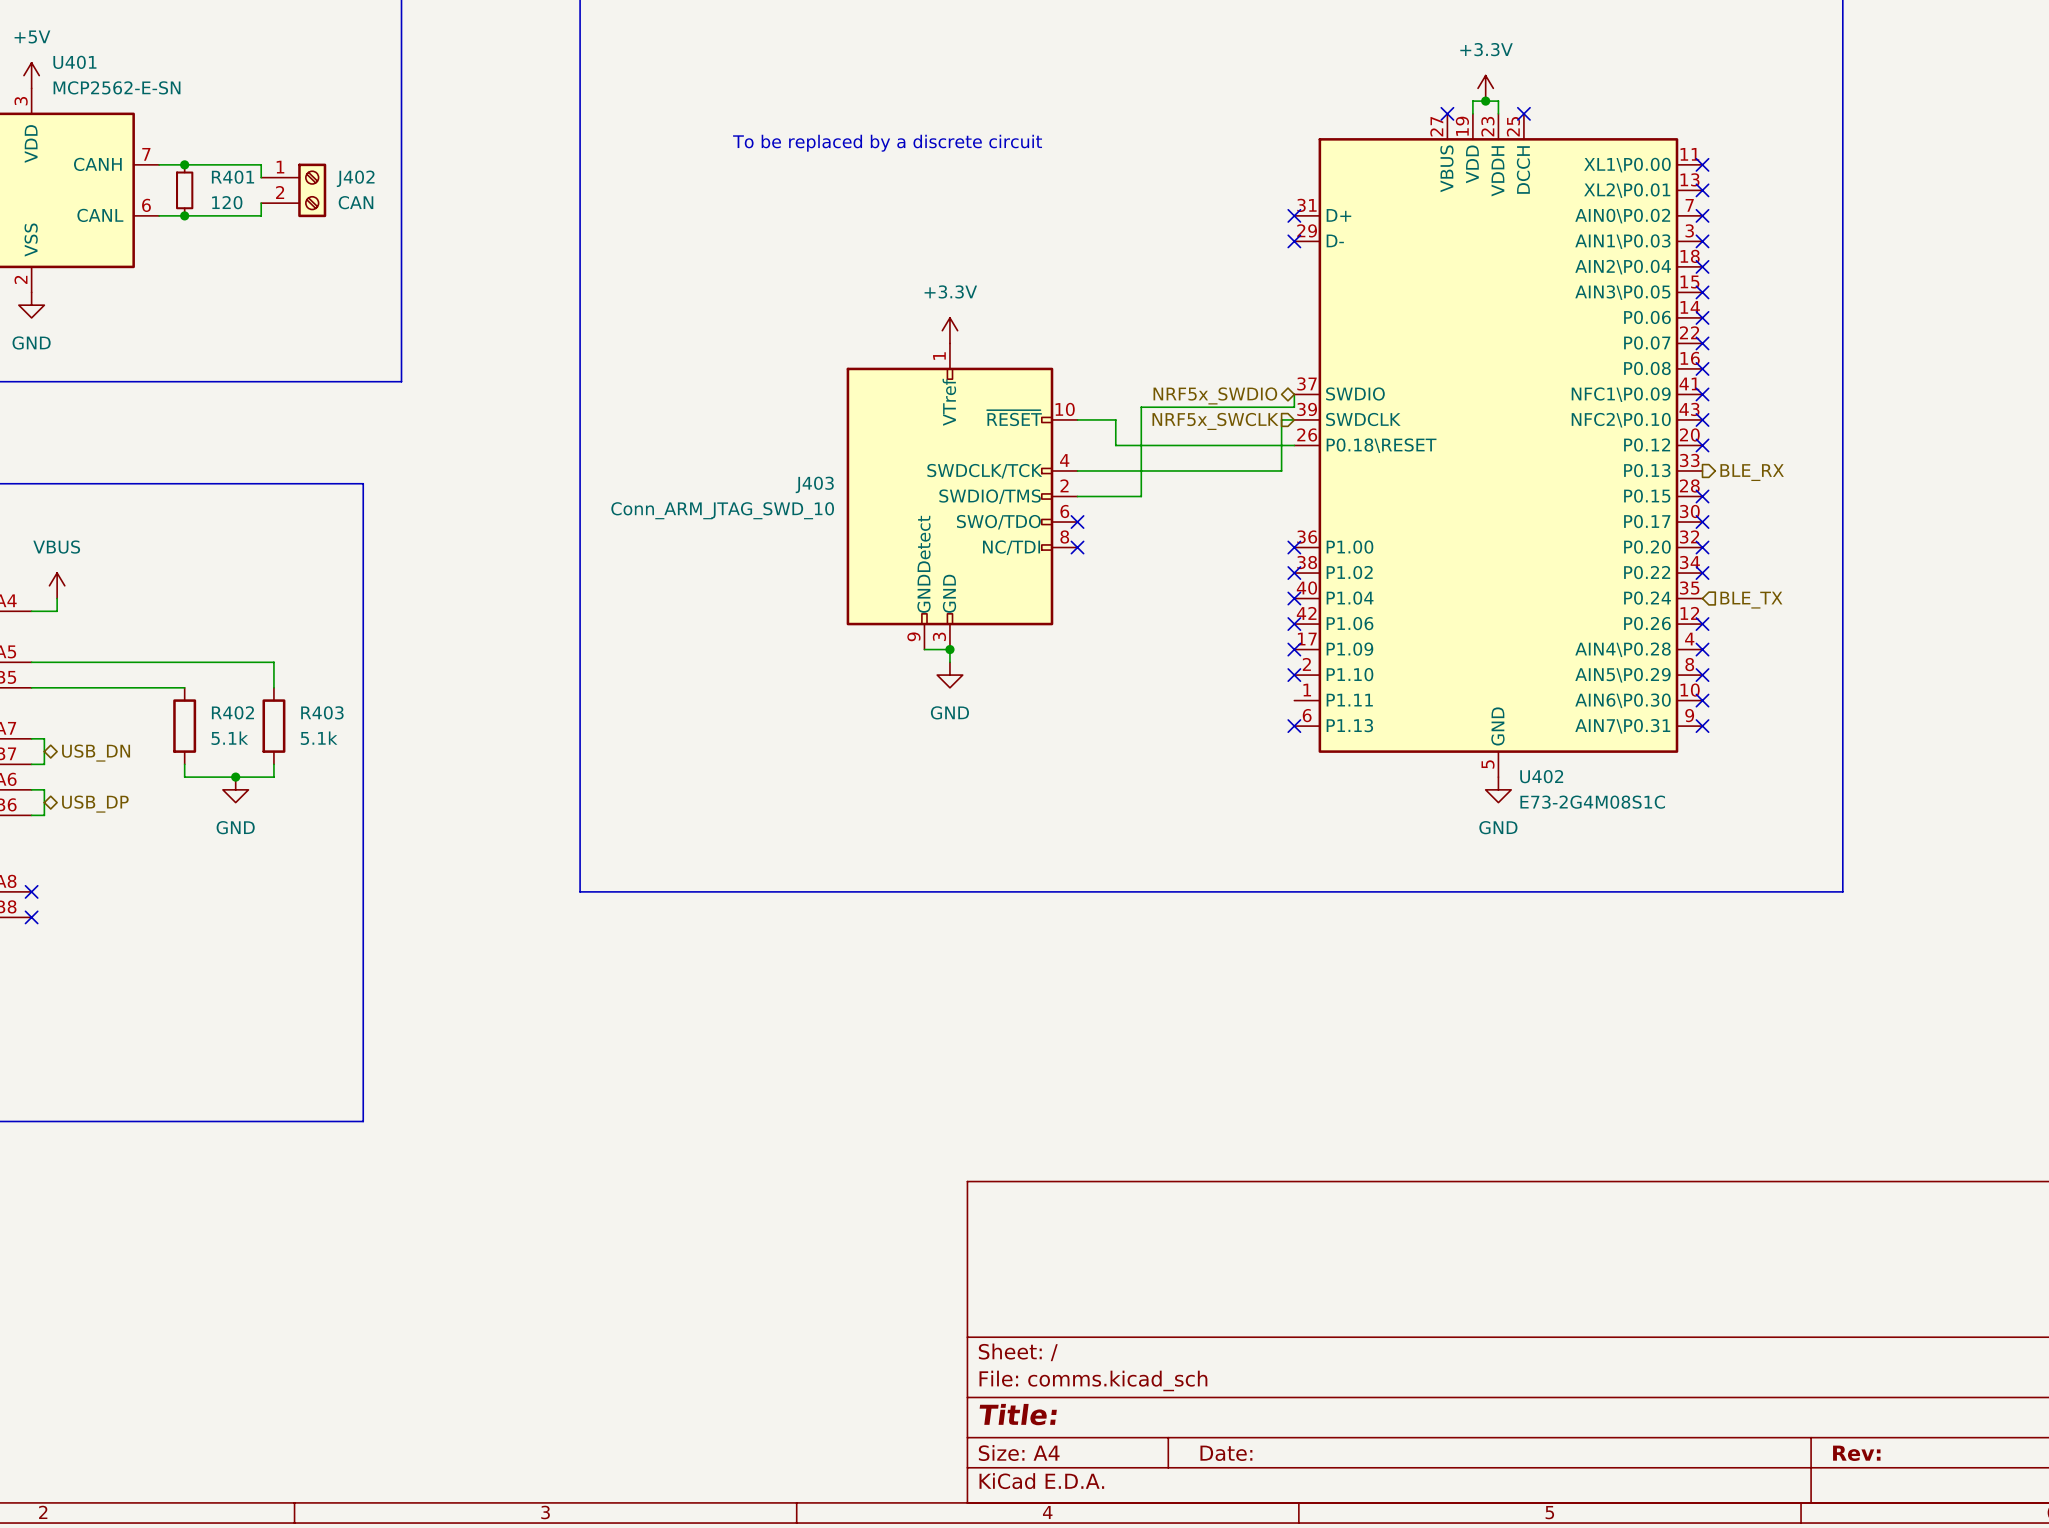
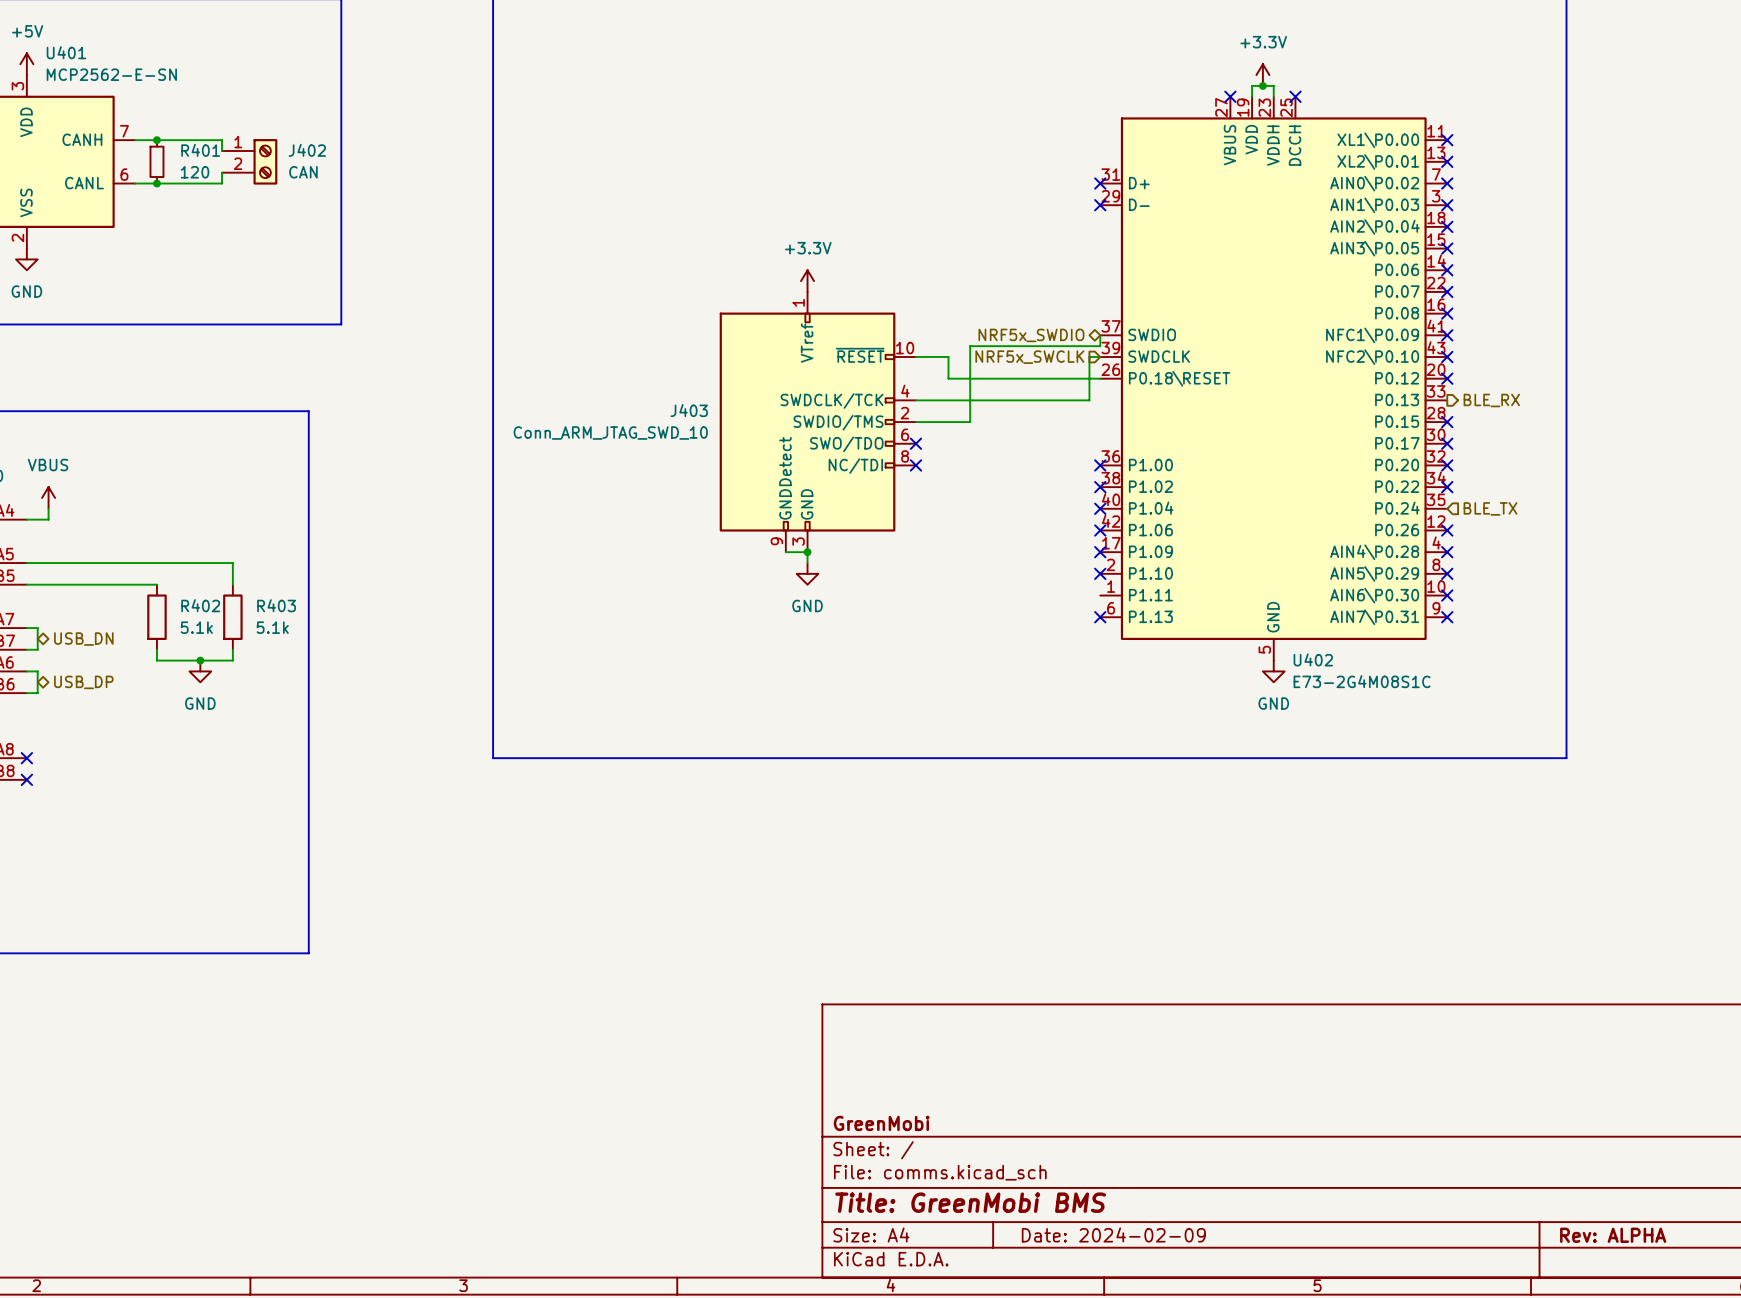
text: To be replaced by a discrete circuit (887, 143) -> none
title block: none -> GreenMobi (881, 1123)
title block: Title: (1018, 1414) -> Title: GreenMobi BMS (970, 1202)
title block: Date: (1226, 1453) -> Date: 2024-02-09 (1113, 1234)
title block: Rev: (1856, 1453) -> Rev: ALPHA (1613, 1235)

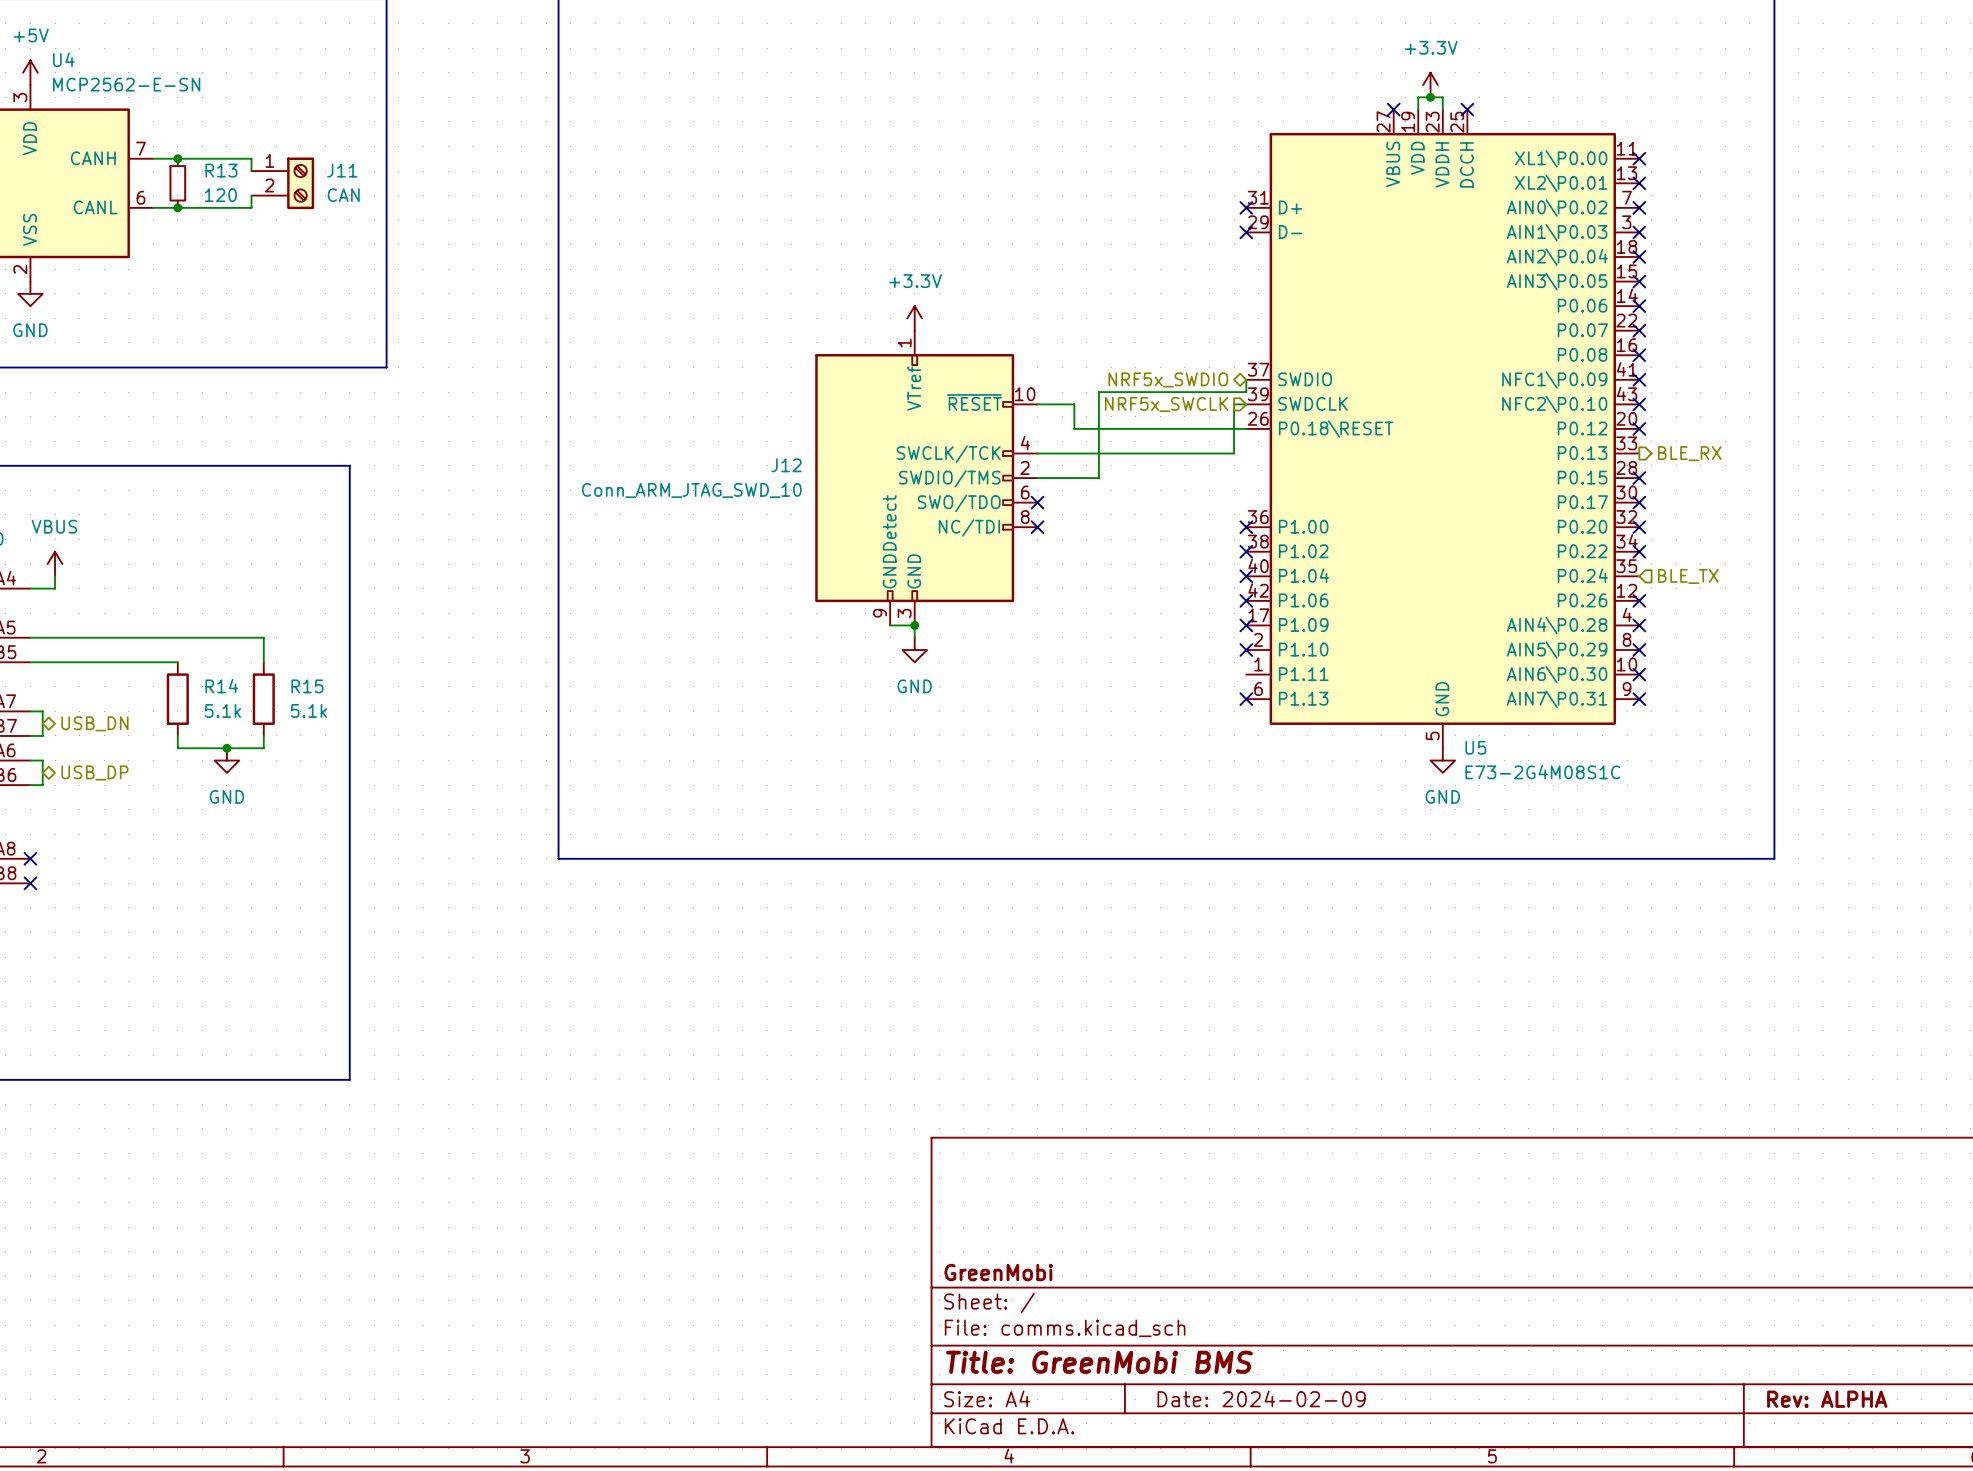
U401 name: U401 (66, 52) -> U4 (63, 59)
R401 name: R401 (200, 150) -> R13 (221, 170)
J402 name: J402 (307, 150) -> J11 (342, 170)
J403 pin name: SWDCLK/TCK (832, 401) -> SWCLK/TCK (948, 454)
J403 name: J403 (689, 410) -> J12 (786, 465)
R402 name: R402 (200, 605) -> R14 (221, 686)
R403 name: R403 (276, 605) -> R15 (307, 686)
U402 name: U402 (1313, 659) -> U5 (1475, 747)

